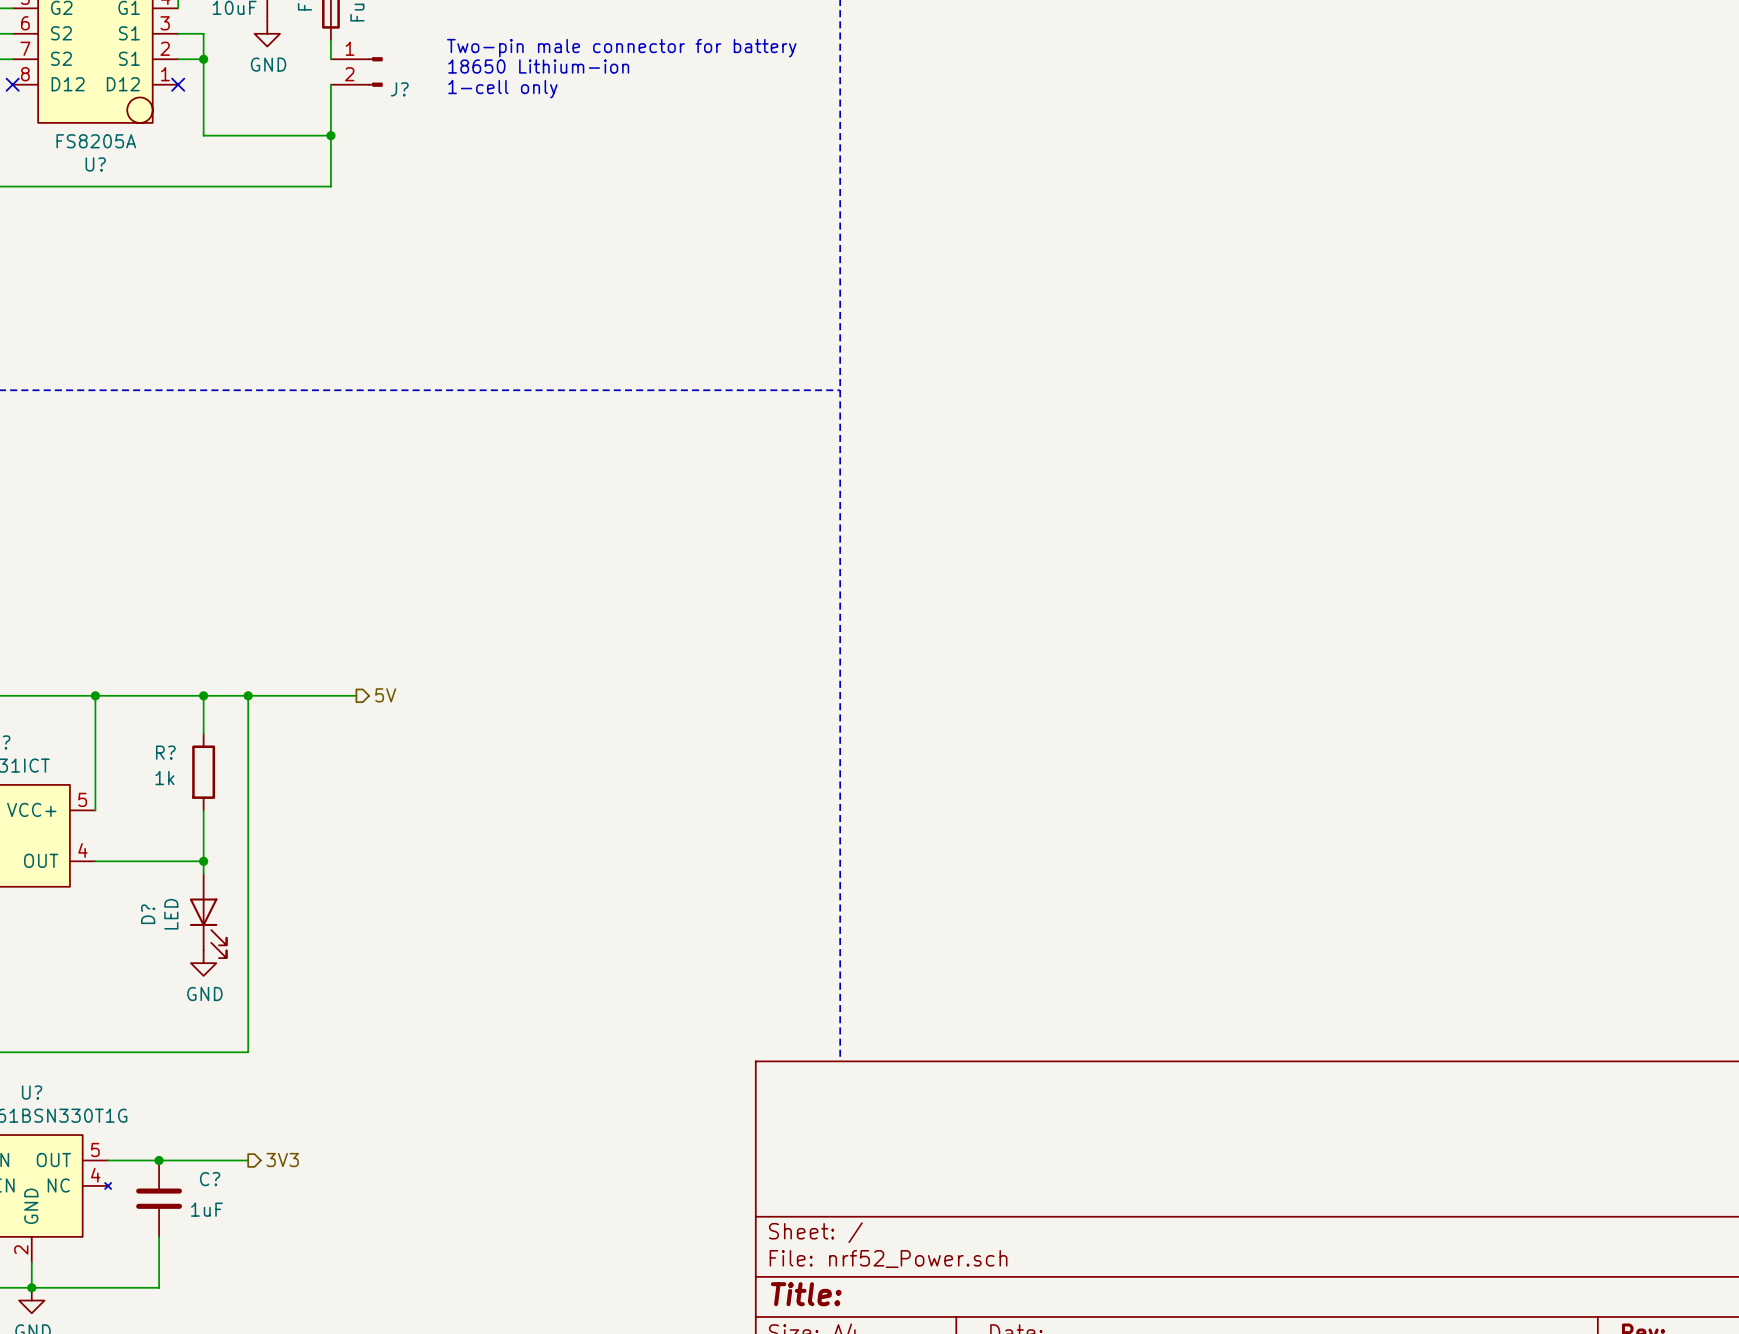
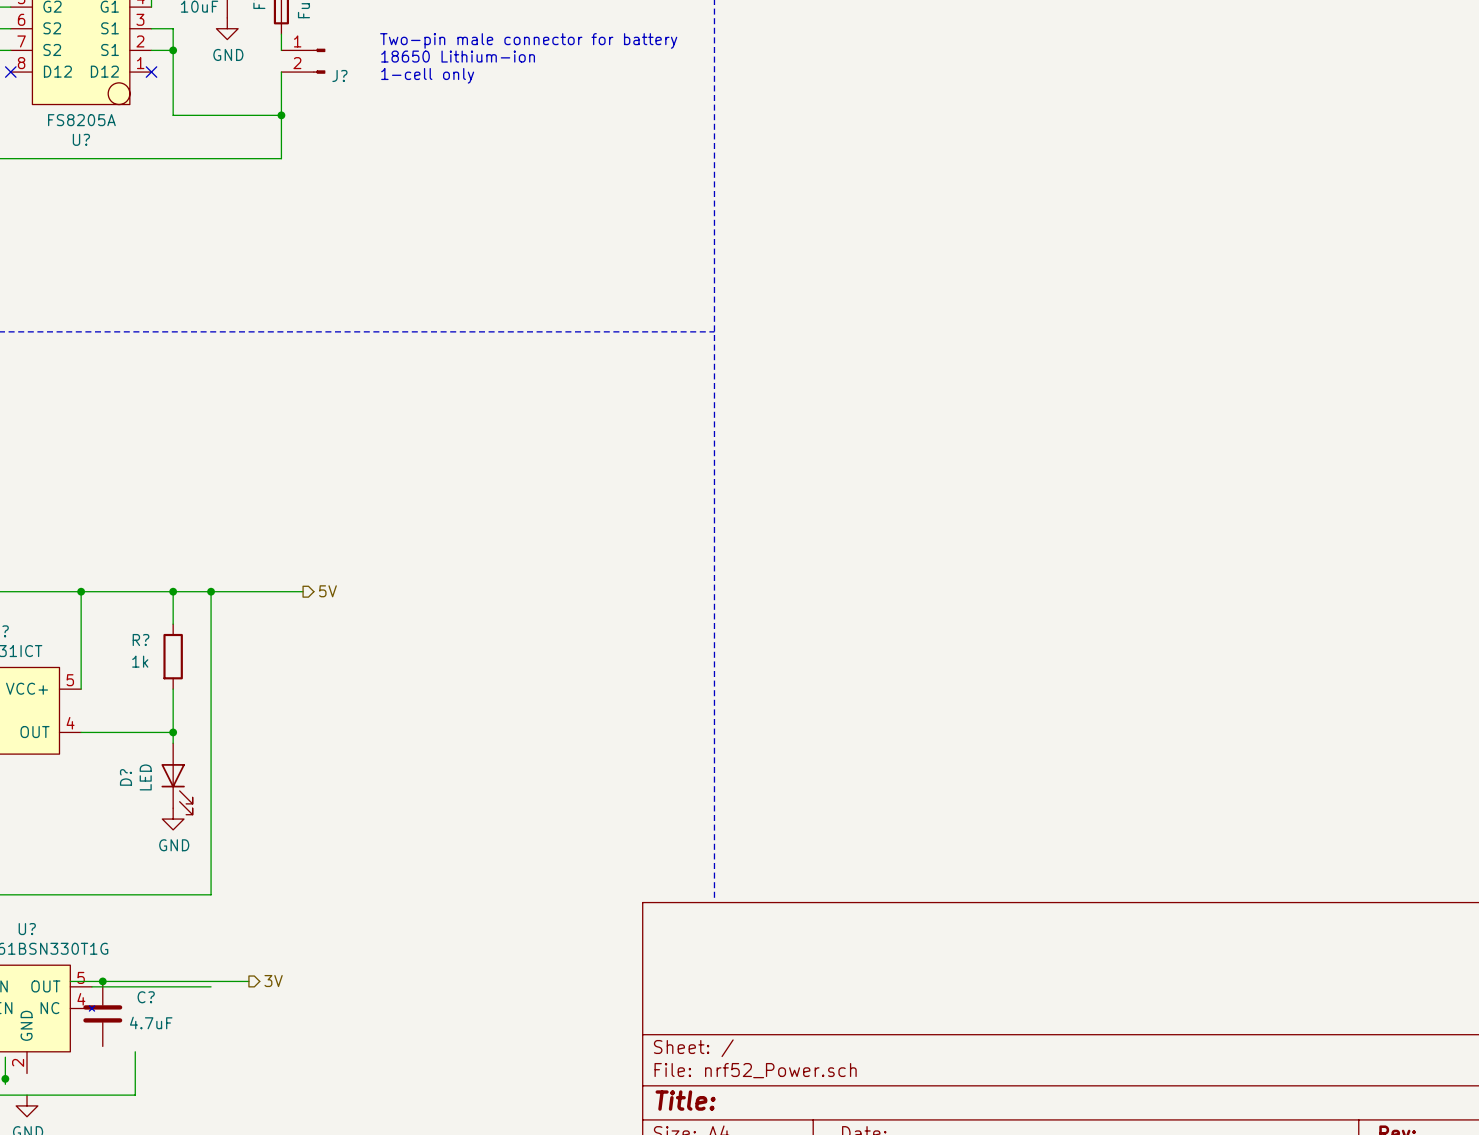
hierarchical label: none -> 3V (273, 981)
wire: none -> (70, 981) (248, 981)
junction position: (159, 1160) -> (102, 981)
hierarchical label: 3V3 (282, 1160) -> none
C?: none -> 4.7uF (102, 1013)
C?: 1uF (159, 1198) -> none
wire: none -> (5, 1057) (5, 1084)
wire: (31, 1262) (31, 1287) -> none
junction position: (31, 1287) -> (5, 1078)

